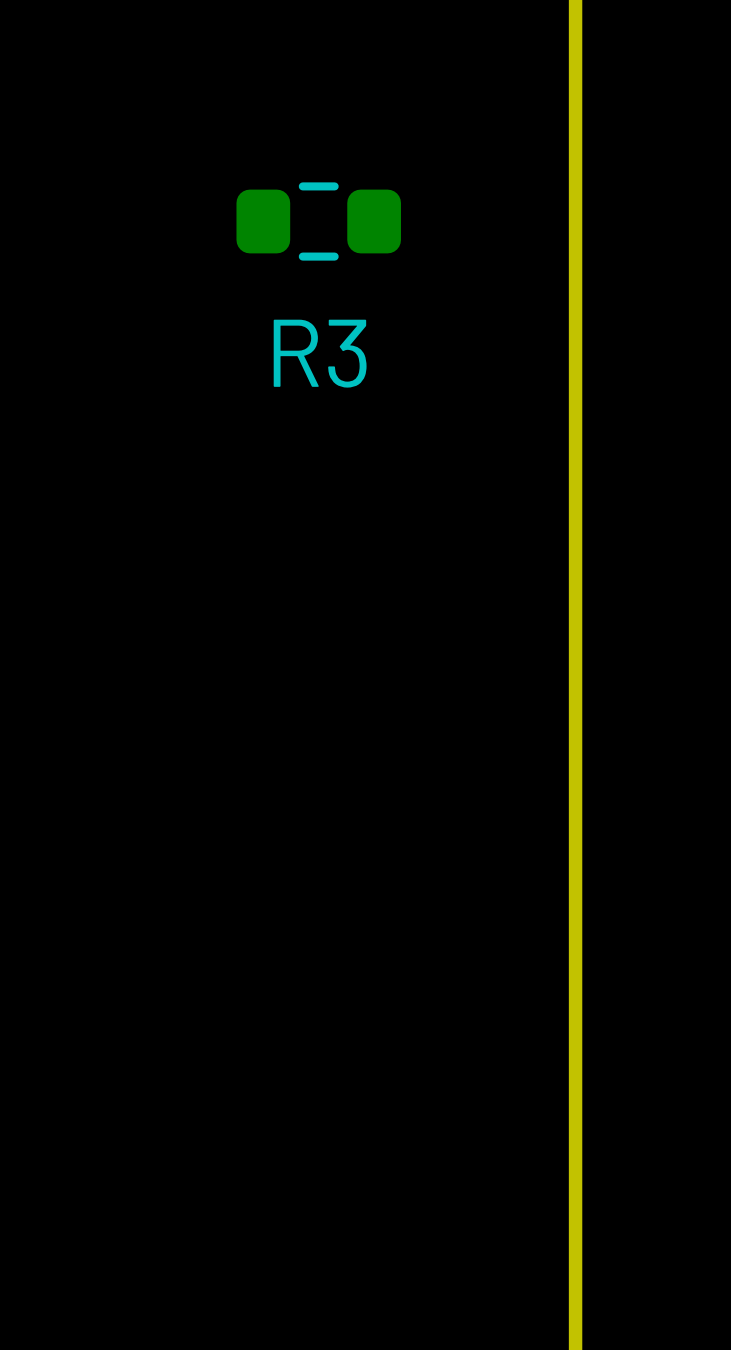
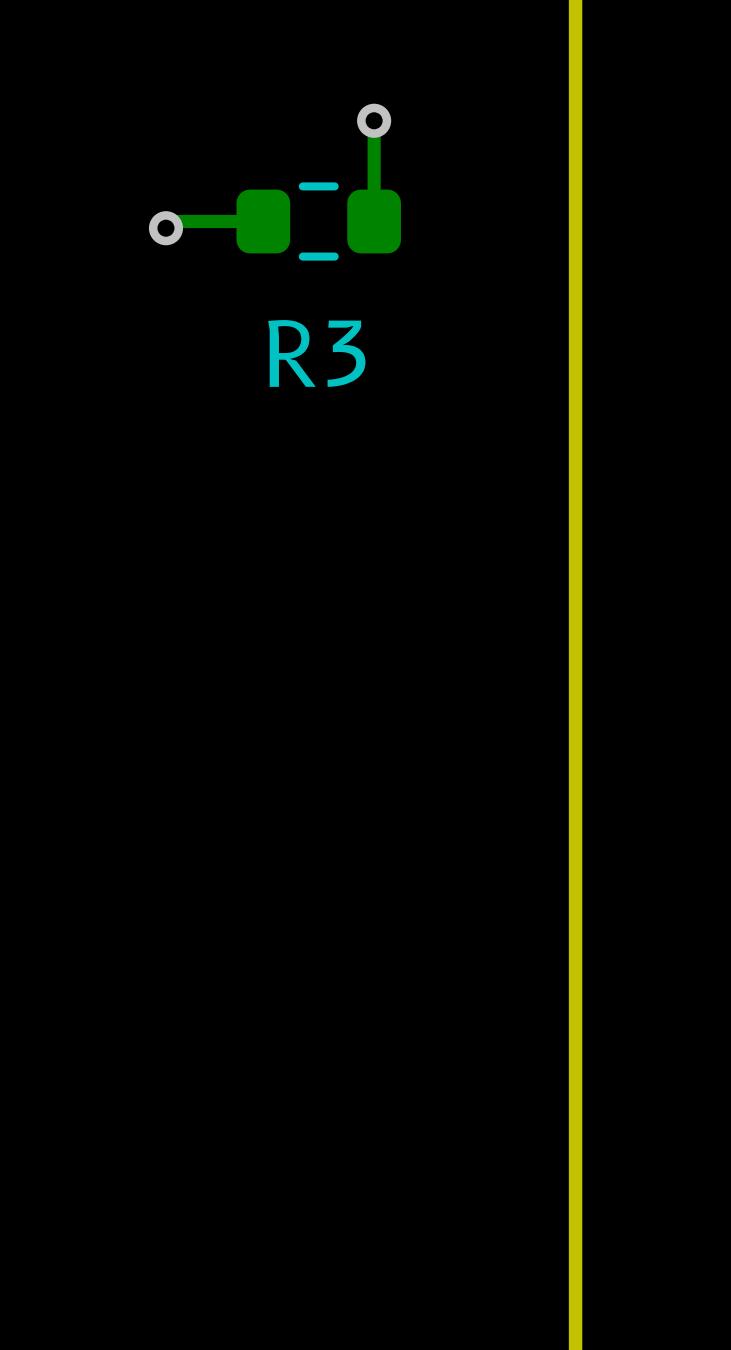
track: none -> (374, 120) (374, 221)
via: none -> (374, 120)
track: none -> (263, 221) (172, 221) (165, 228)
via: none -> (165, 228)

